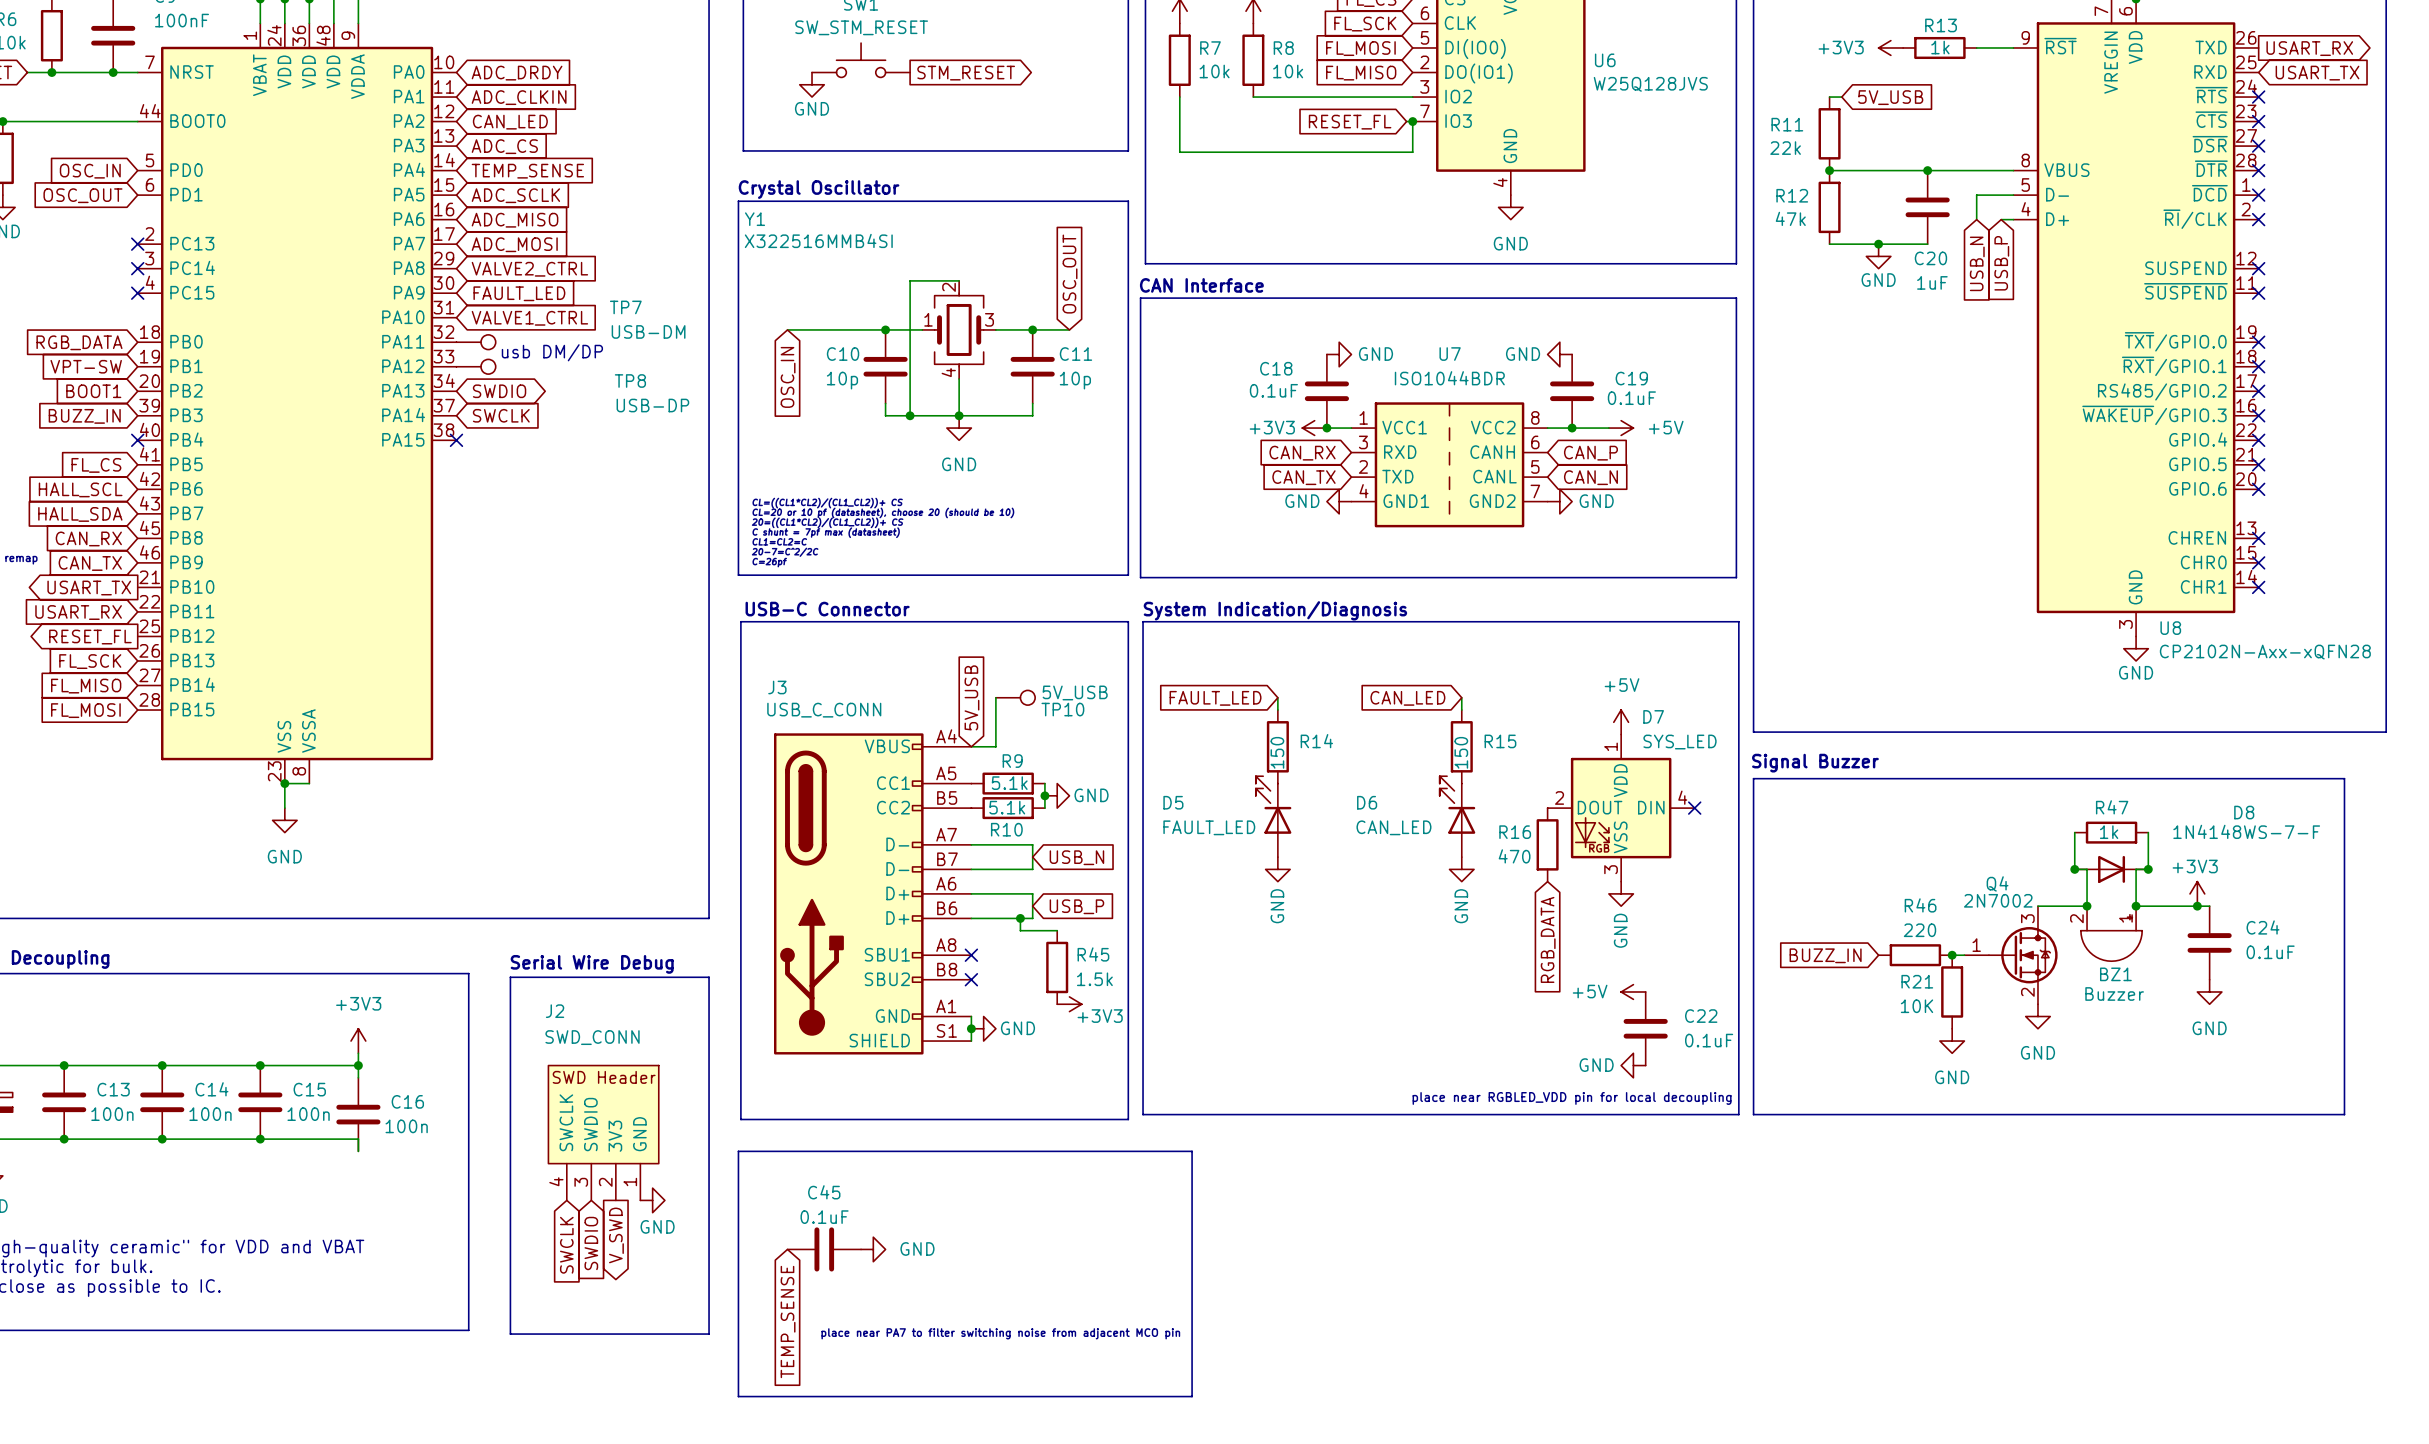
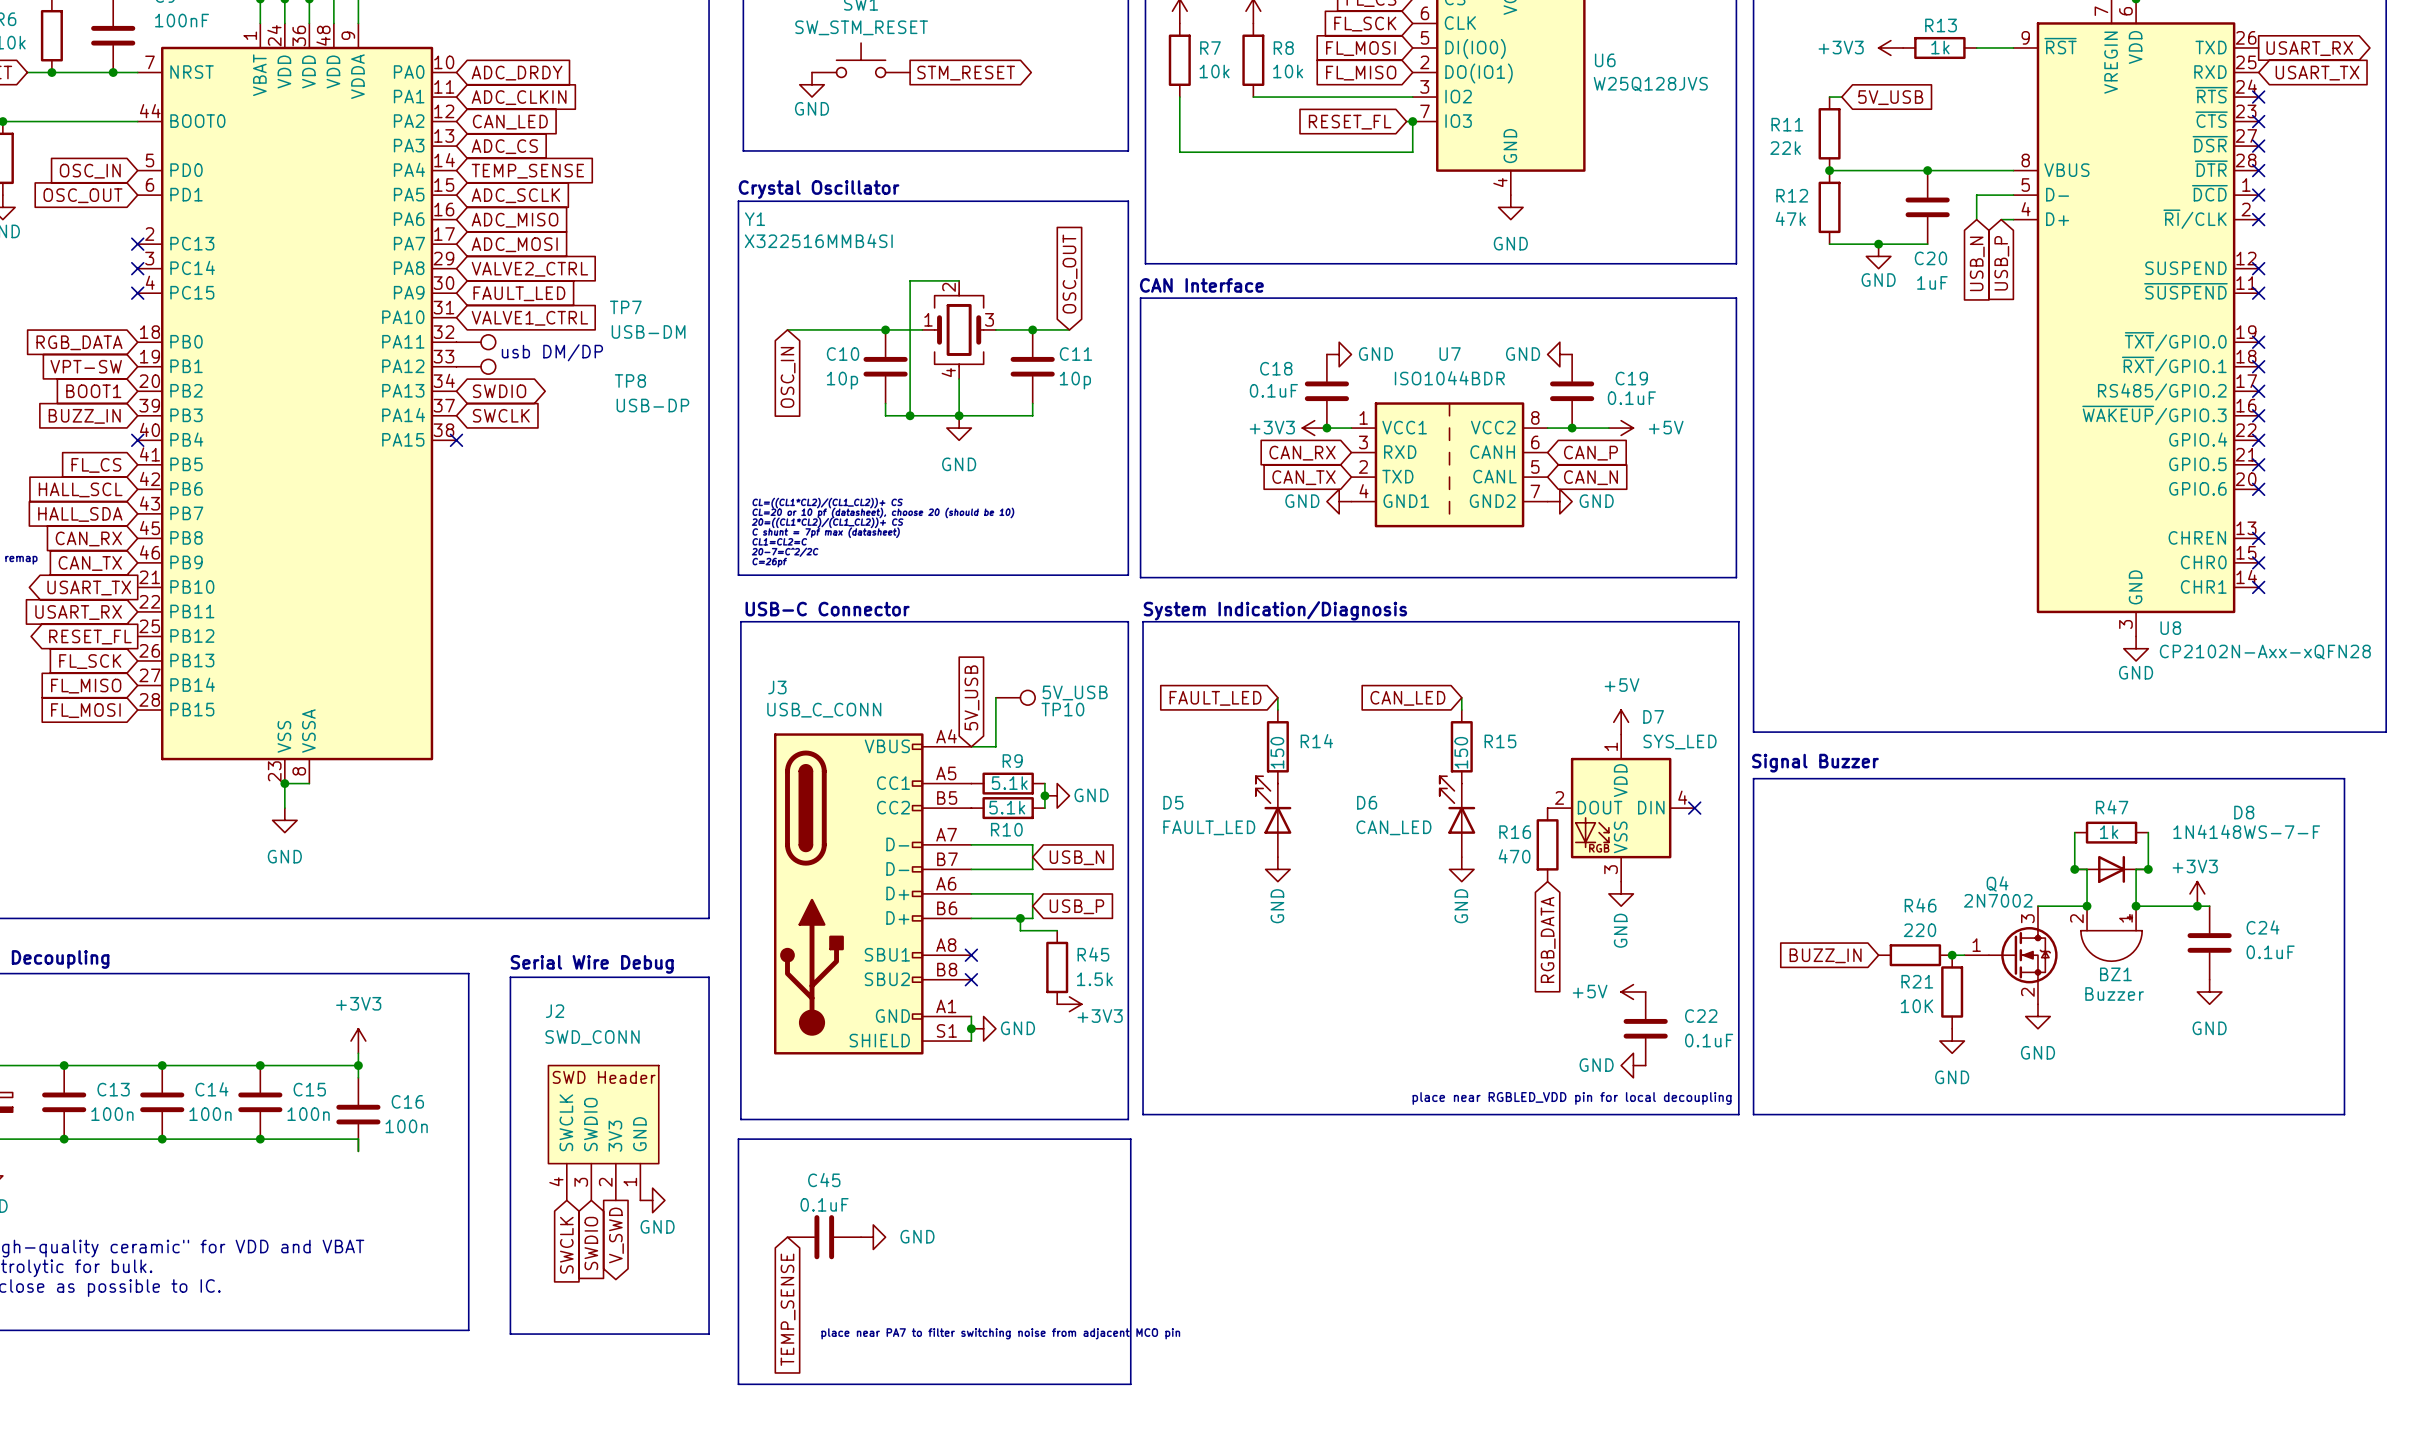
line: (738, 1151) (1192, 1151) (1192, 1396) (738, 1396) (738, 1384) -> (738, 1151) (738, 1139) (1130, 1139) (1130, 1384) (738, 1384)
C45 position: (824, 1249) -> (824, 1237)
power symbol position: GND (873, 1249) -> GND (873, 1237)
global label position: TEMP_SENSE (788, 1322) -> TEMP_SENSE (788, 1309)

